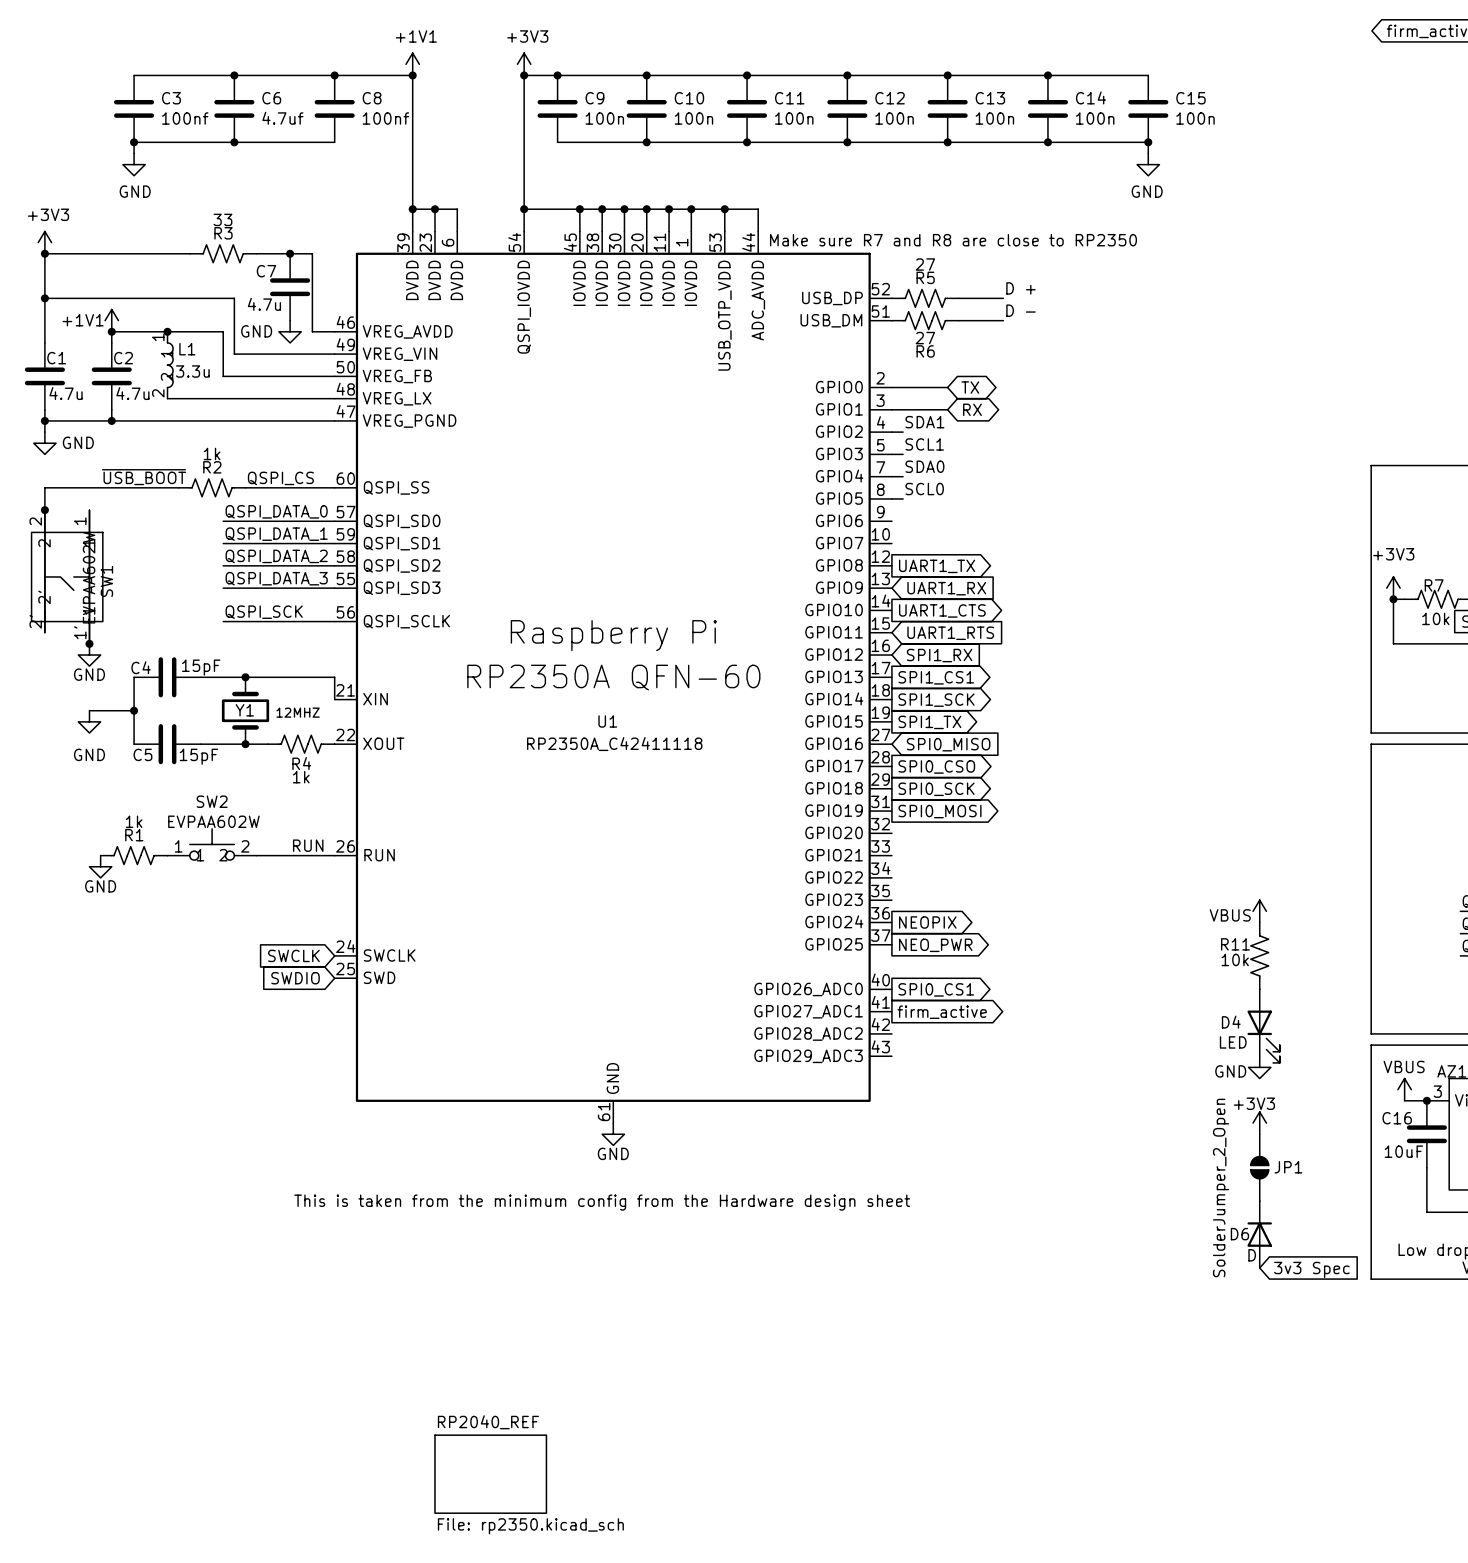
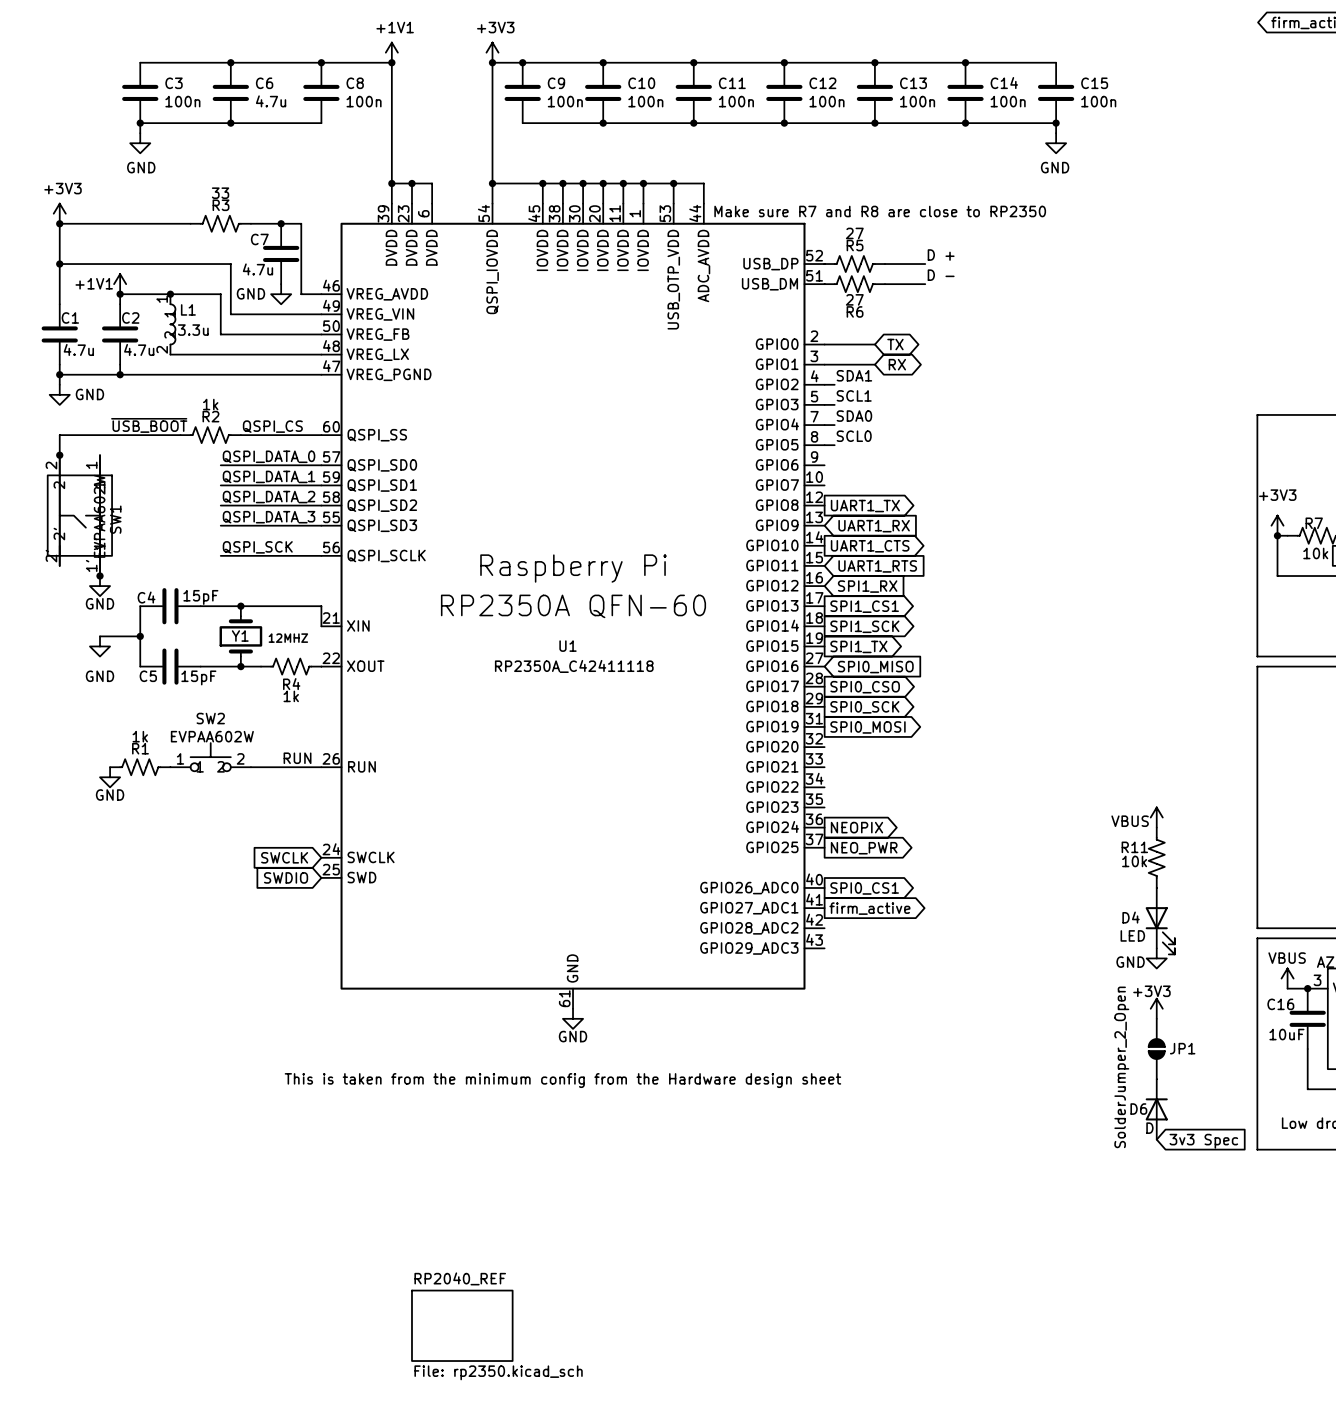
C3 value: 100nf (185, 118) -> 100n (182, 101)
C6 value: 4.7uf (282, 118) -> 4.7u (271, 101)
C8 value: 100nf (385, 118) -> 100n (364, 101)

